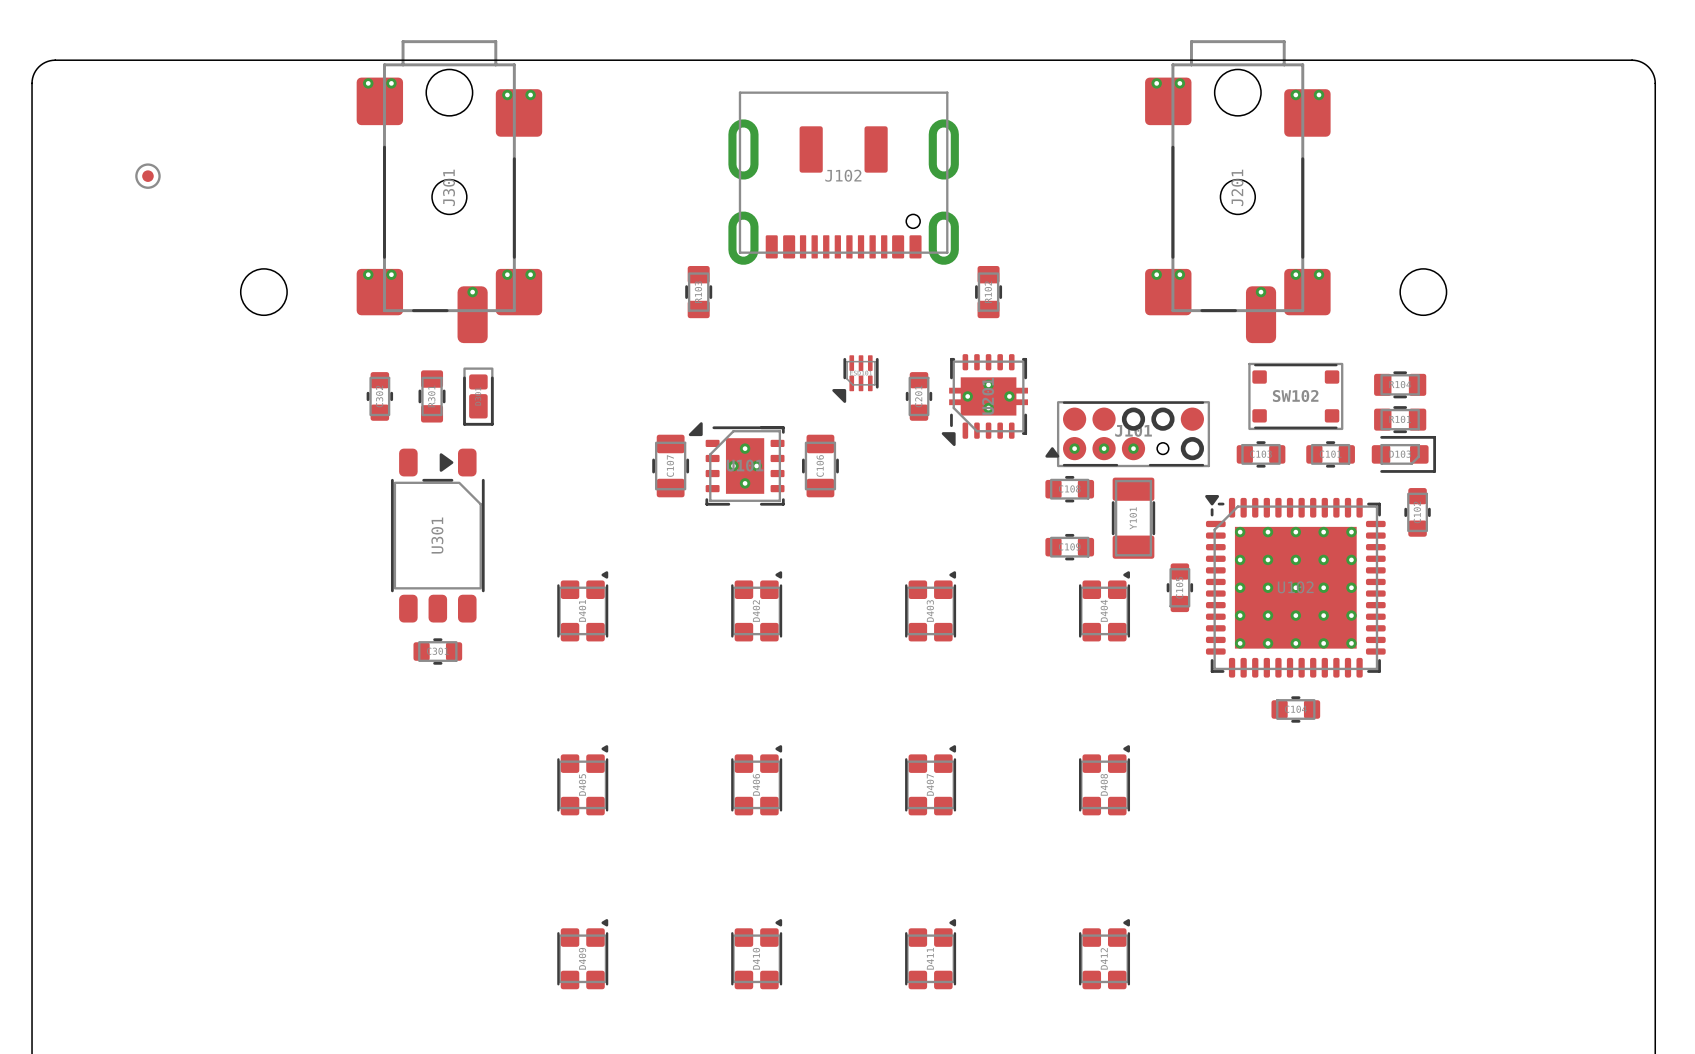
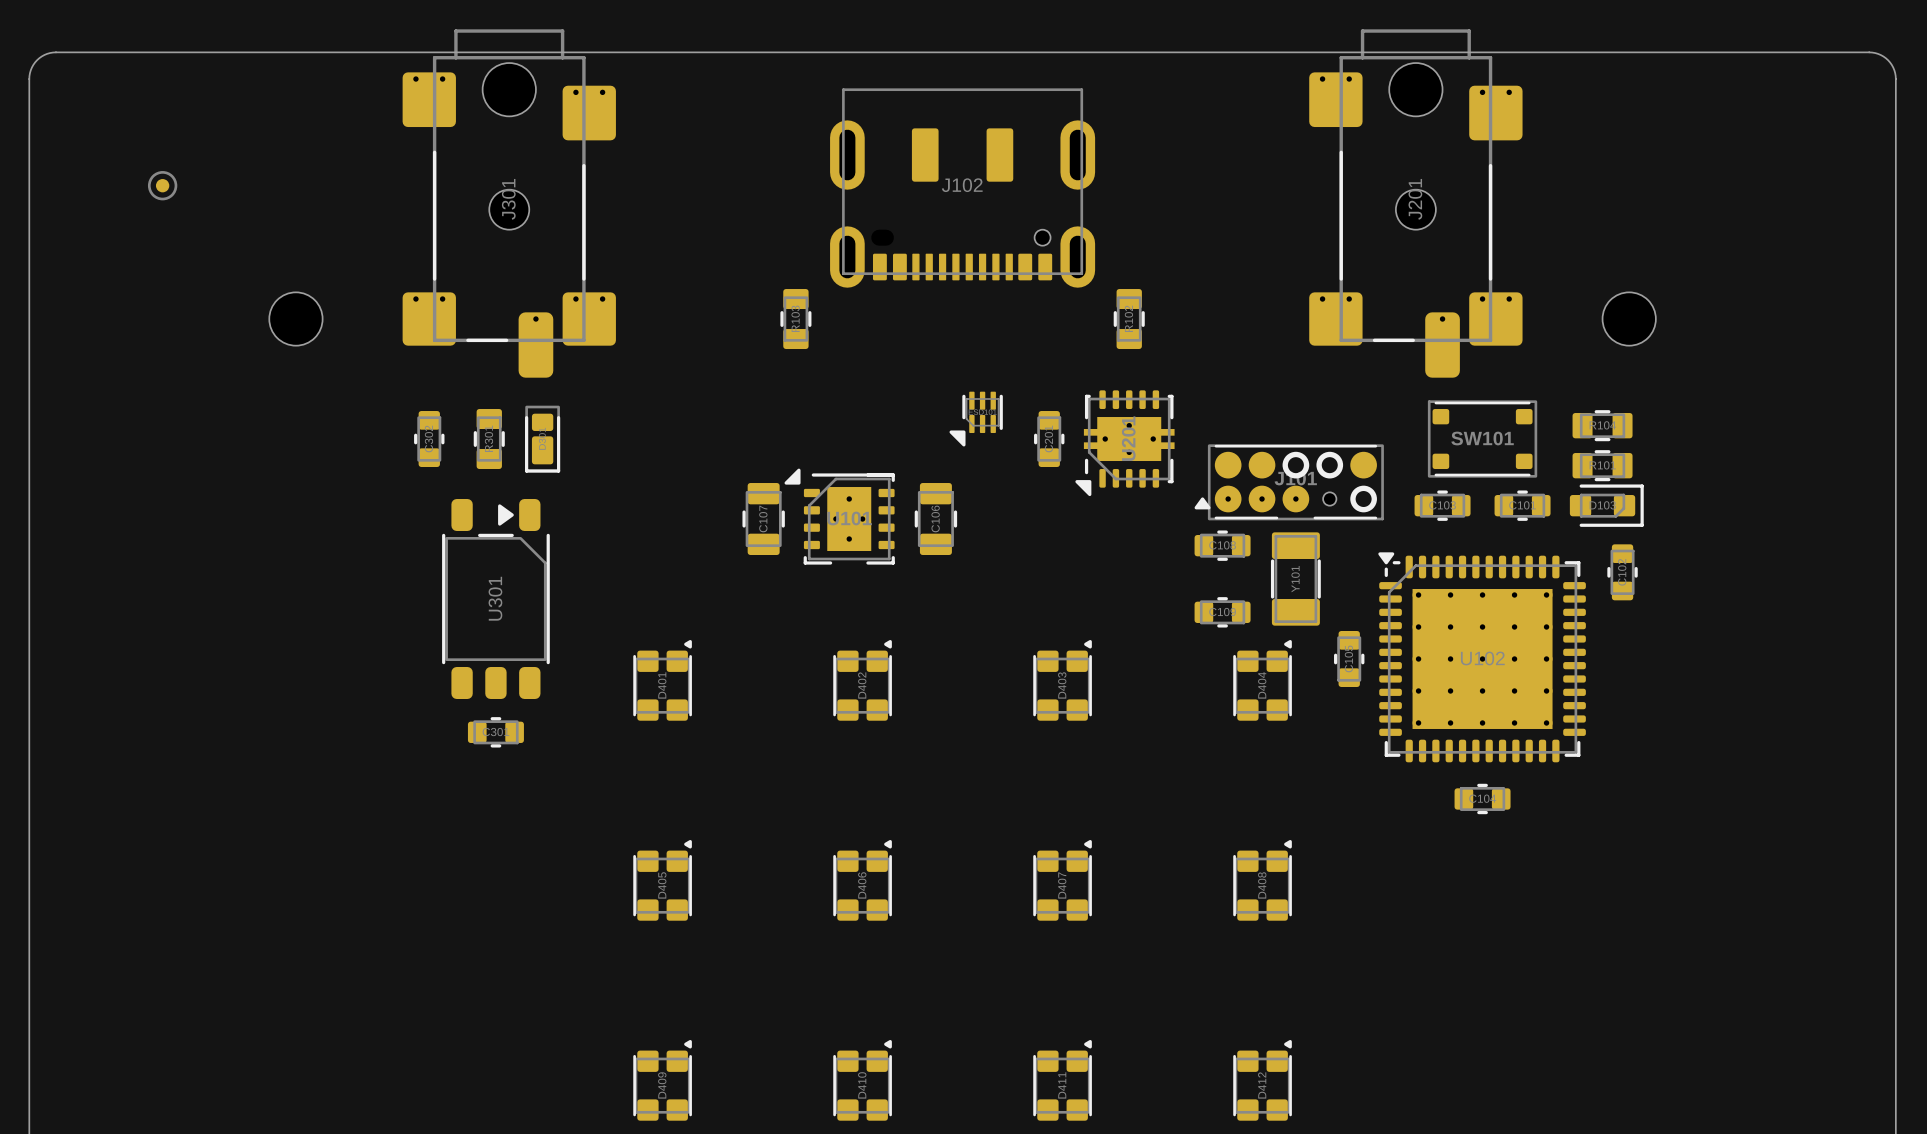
SW102 name: SW102 (1295, 396) -> SW101 (1482, 438)

